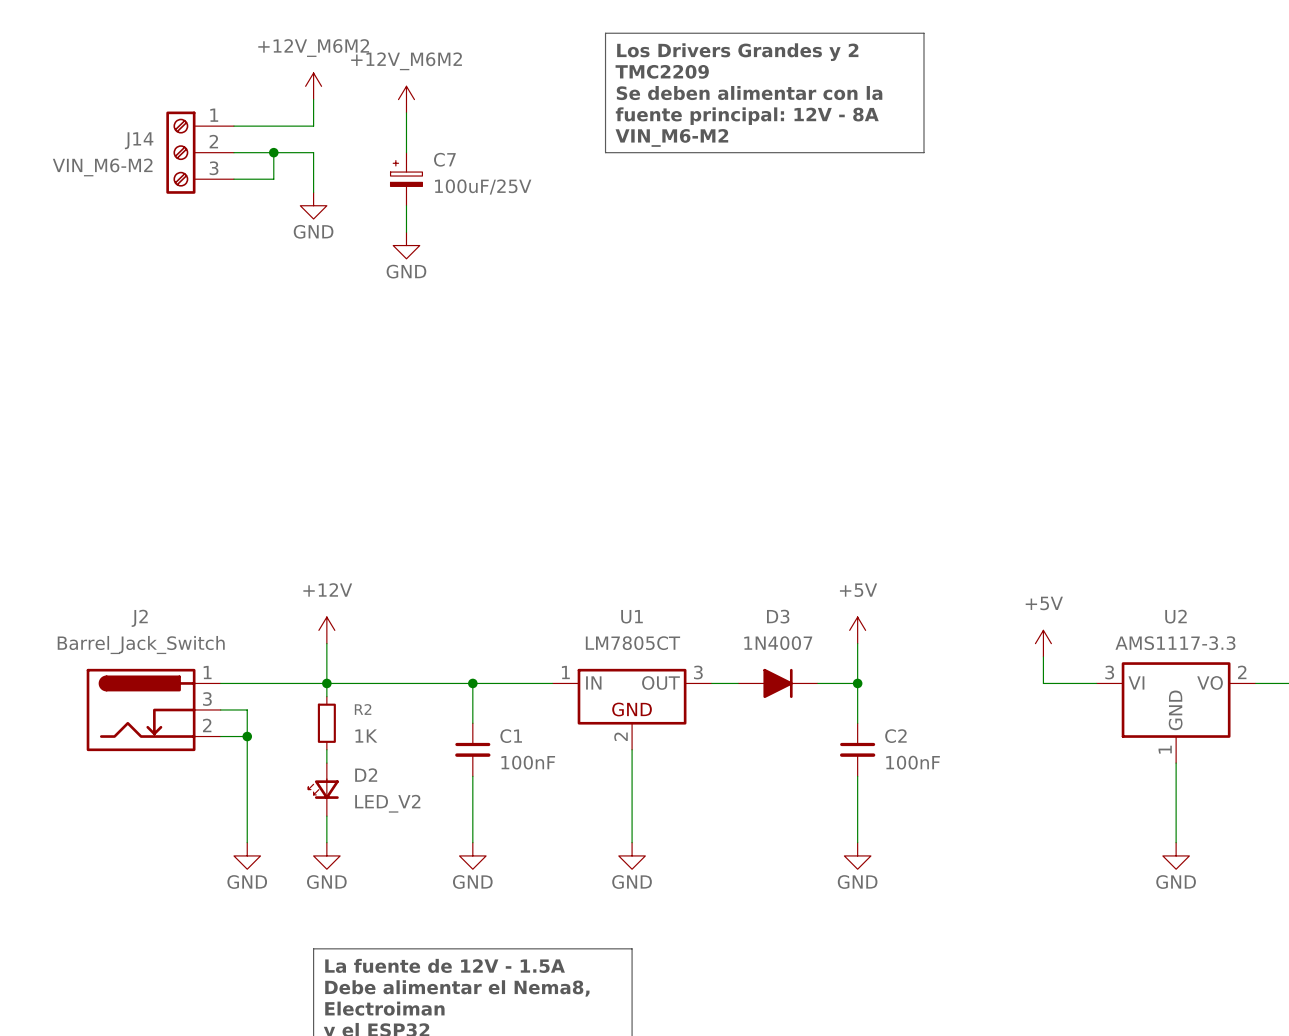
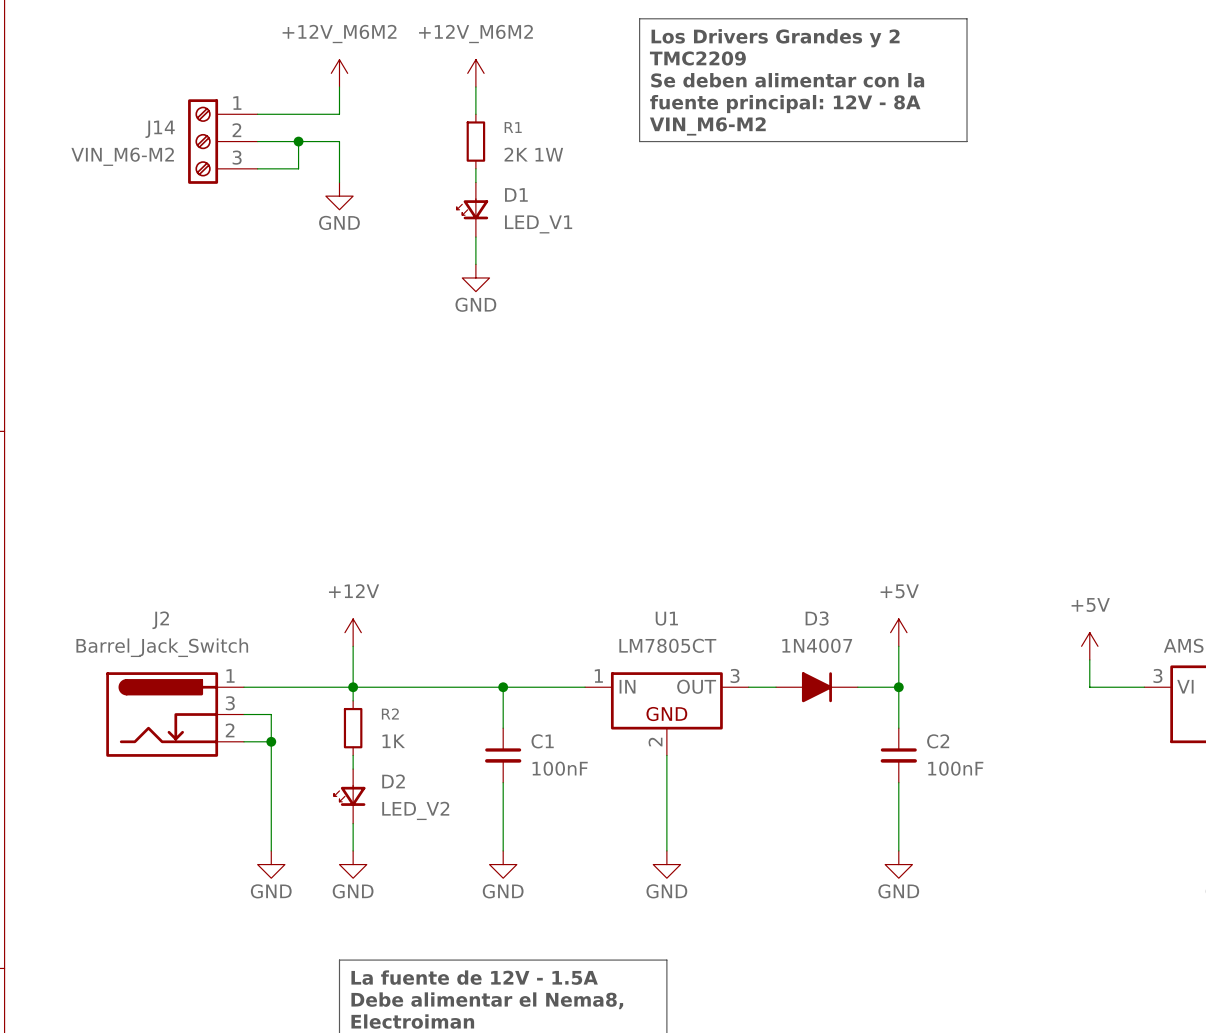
power symbol position: +12V_M6M2 (406, 99) -> +12V_M6M2 (475, 73)
wire: none -> (475, 87) (475, 114)
wire: (406, 112) (406, 152) -> none
R1: none -> 2K 1W (475, 141)
C7: 100uF/25V (406, 179) -> none
wire: none -> (475, 168) (475, 182)
wire: (406, 205) (406, 232) -> (475, 237) (475, 264)
D1: none -> LED_V1 (472, 209)
power symbol position: GND (406, 245) -> GND (475, 277)

